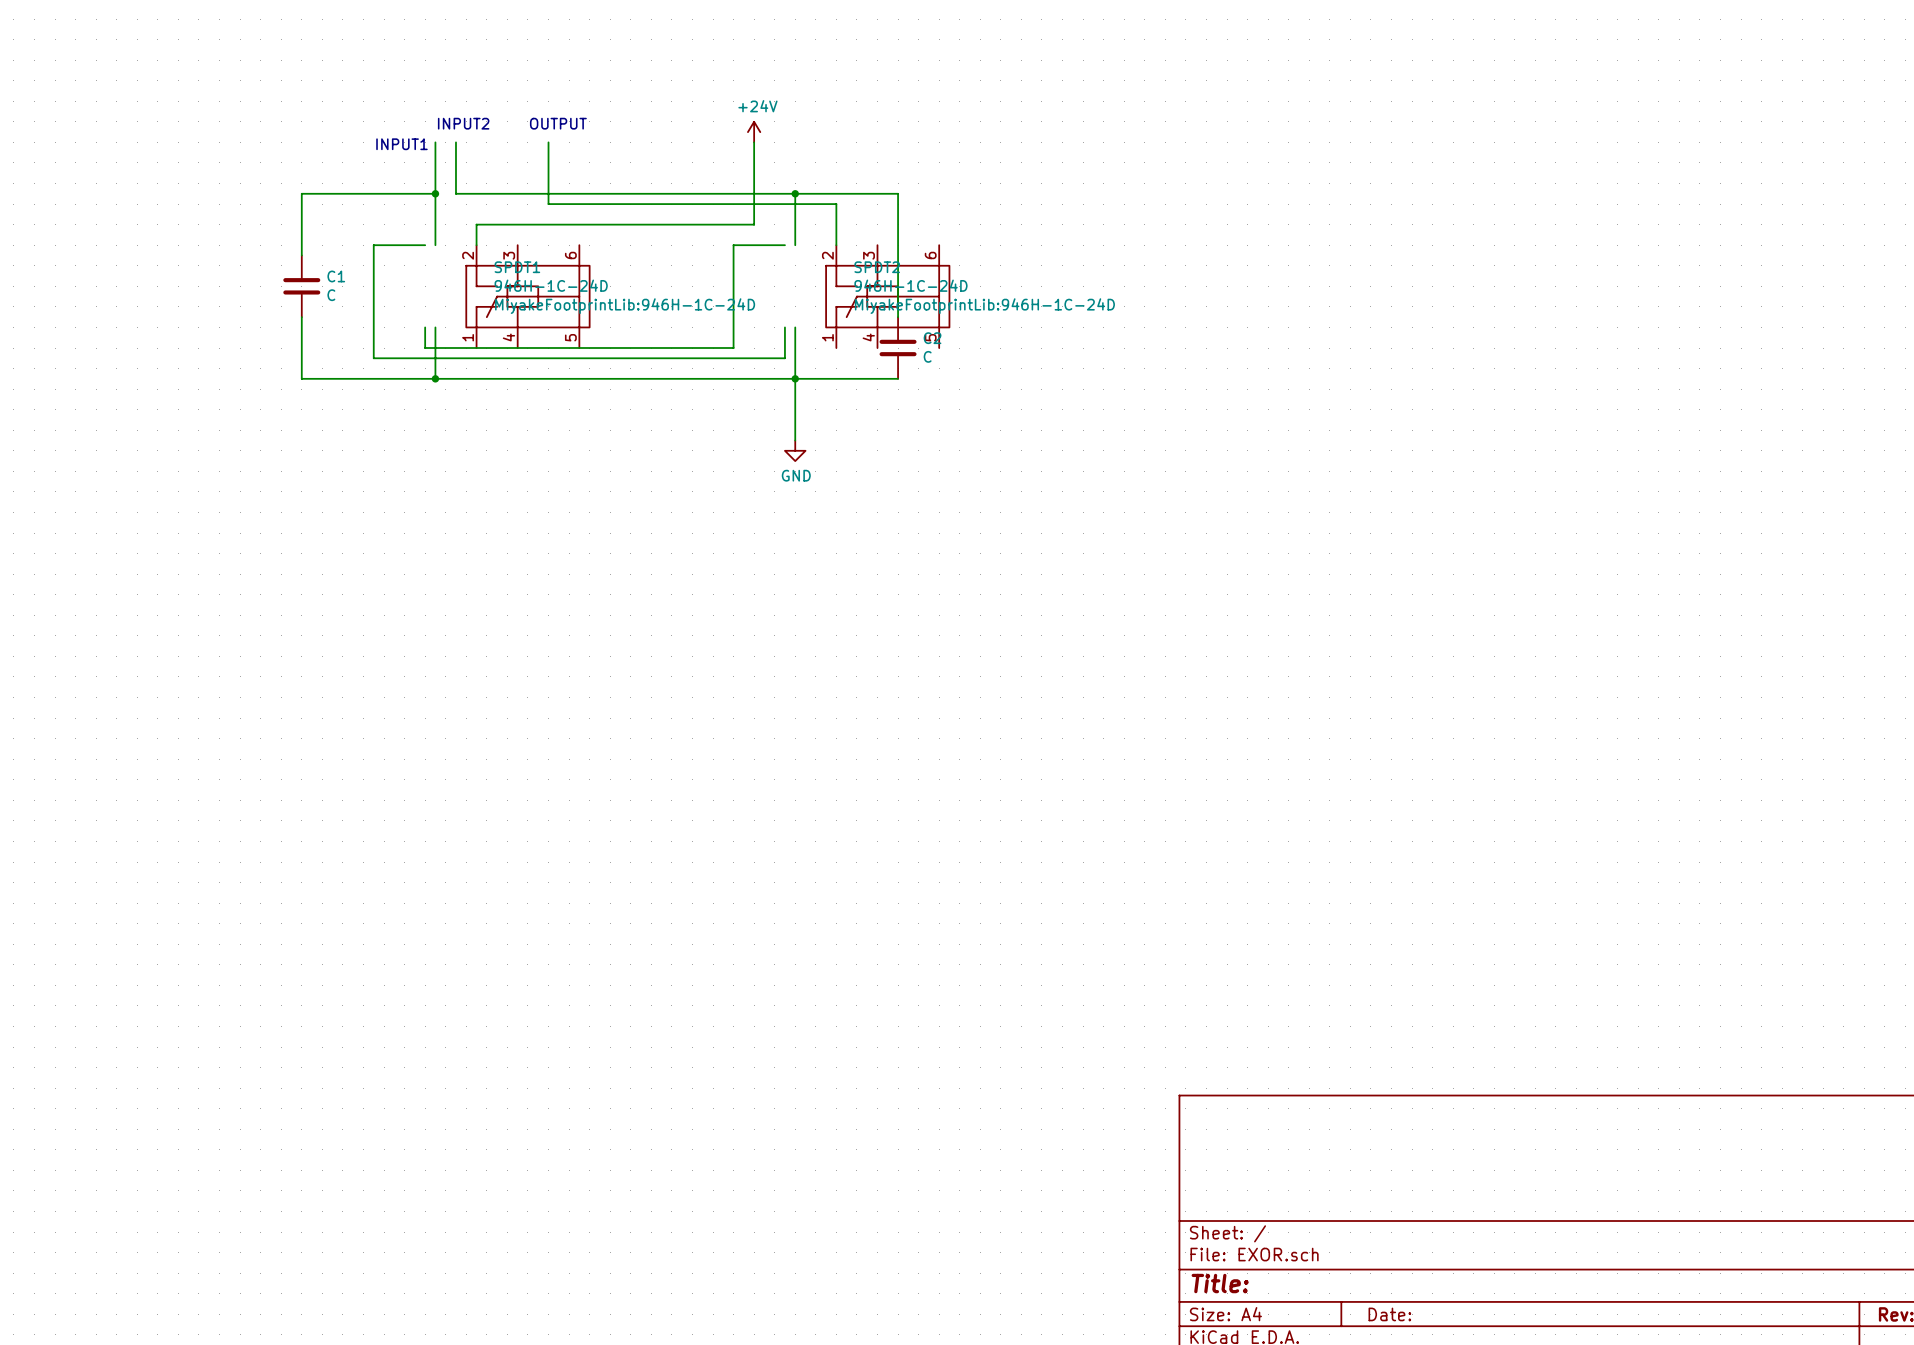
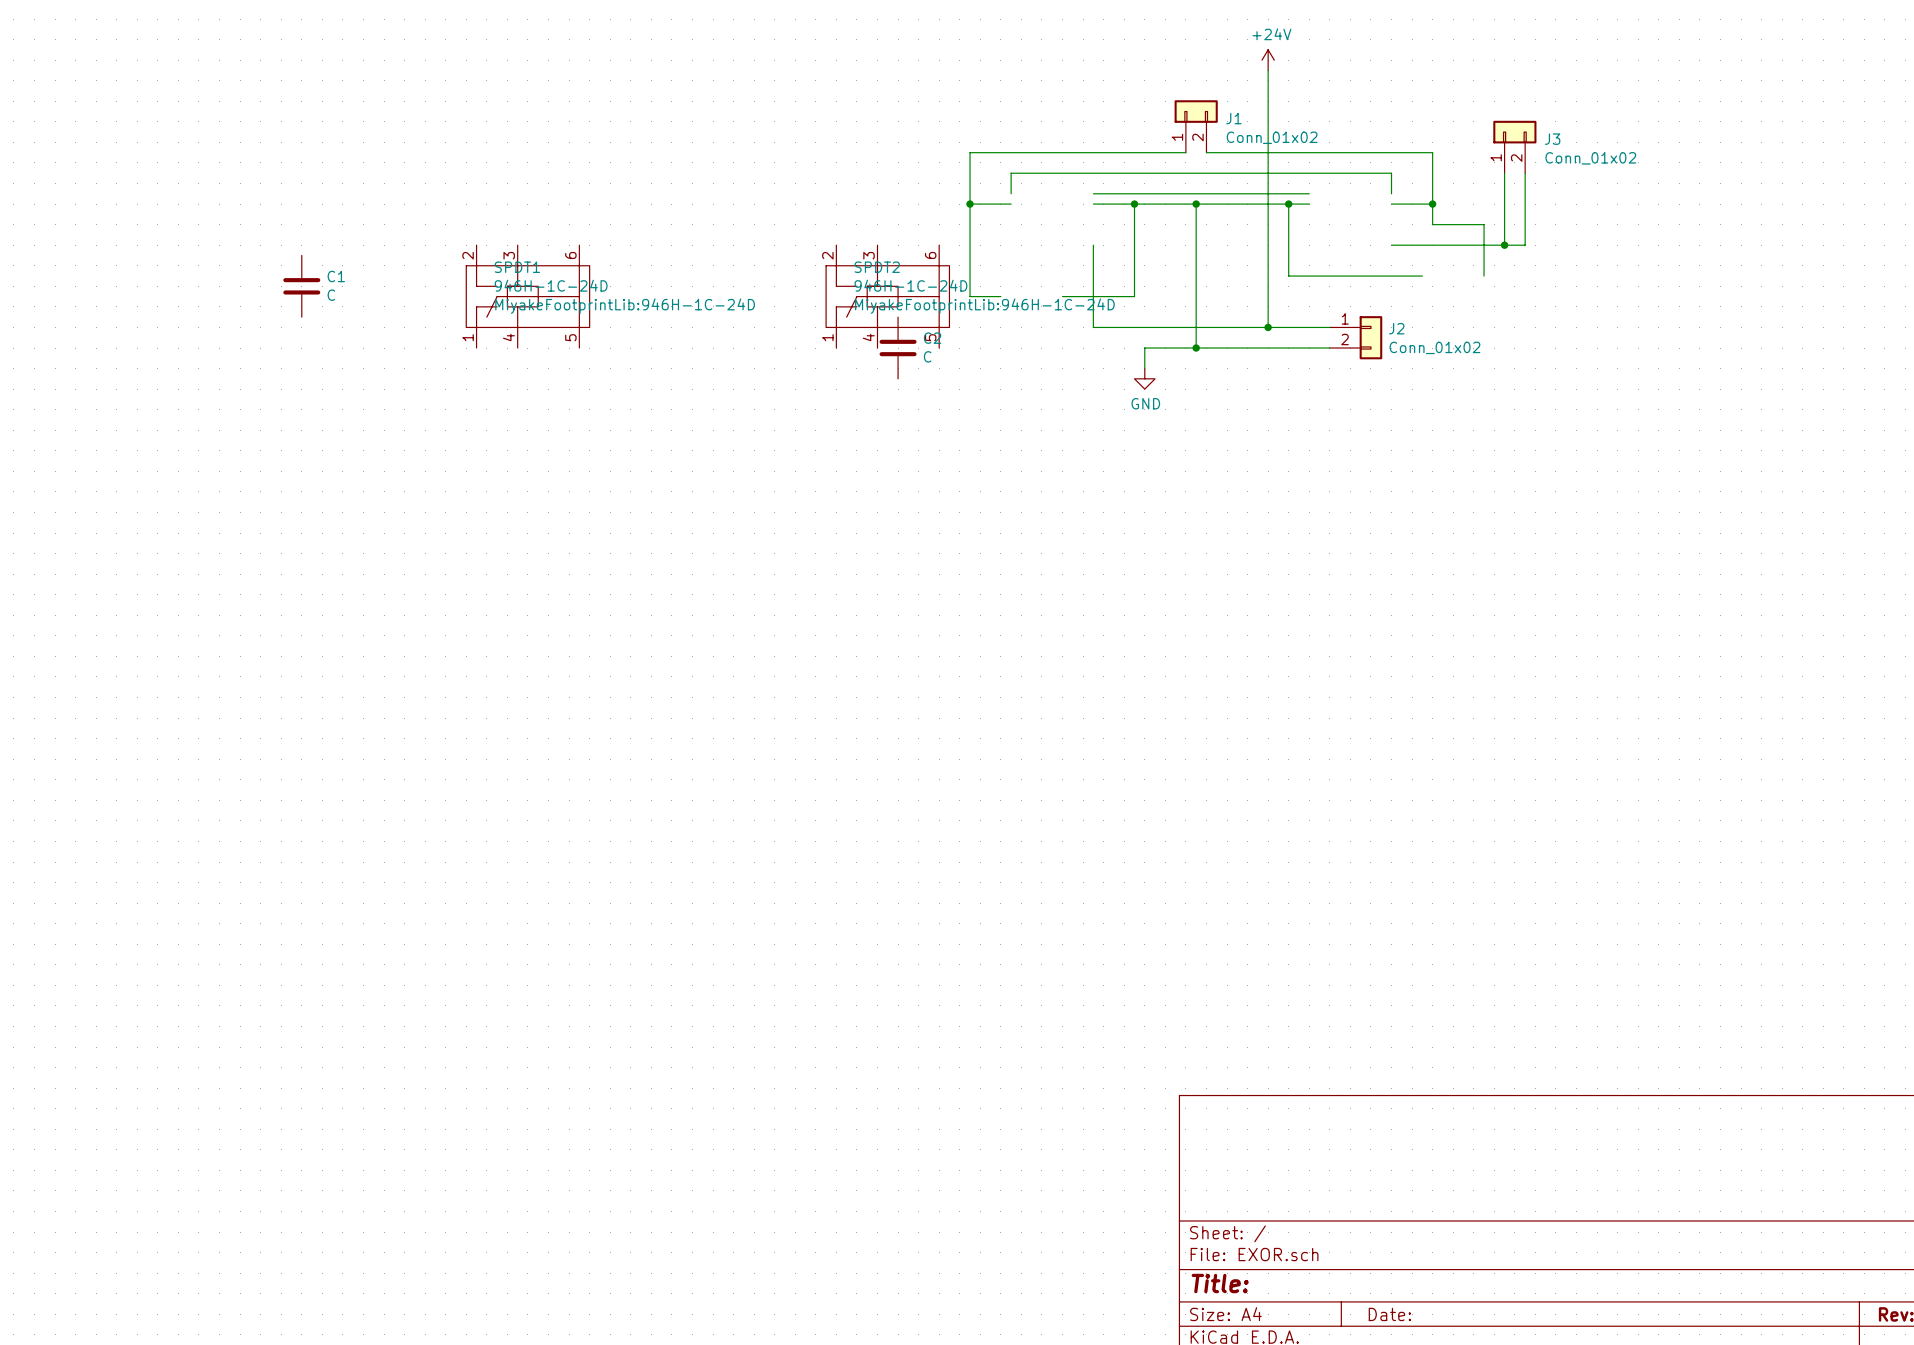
power symbol: none -> +24V (1268, 60)
wire: none -> (1268, 70) (1268, 327)
text: INPUT2 (463, 123) -> none
text: OUTPUT (558, 123) -> none
J1: none -> Conn_01x02 (1196, 126)
power symbol: +24V (754, 132) -> none
wire: (435, 142) (435, 245) -> none
wire: (455, 142) (455, 193) (898, 193) (898, 317) -> none
wire: (548, 142) (548, 204) (836, 204) (836, 245) -> none
wire: (754, 142) (754, 224) (476, 224) (476, 245) -> none
text: INPUT1 (401, 144) -> none
J3: none -> Conn_01x02 (1514, 147)
wire: none -> (1185, 152) (970, 152) (970, 296) (1000, 296)
wire: none -> (1206, 152) (1432, 152) (1432, 224) (1484, 224) (1484, 276)
wire: none -> (1504, 173) (1504, 245)
wire: none -> (1525, 173) (1525, 245) (1391, 245)
wire: (435, 193) (301, 193) (301, 255) -> none
junction: (435, 193) -> none
wire: (795, 193) (795, 245) -> none
junction: (795, 193) -> none
wire: none -> (1011, 193) (1011, 173) (1391, 173) (1391, 193)
wire: none -> (1093, 193) (1309, 193)
wire: none -> (970, 204) (1011, 204)
junction: none -> (970, 204)
wire: none -> (1093, 204) (1309, 204)
wire: none -> (1134, 204) (1134, 296) (1062, 296)
junction: none -> (1134, 204)
wire: none -> (1196, 204) (1196, 348)
junction: none -> (1196, 204)
wire: none -> (1288, 204) (1288, 276) (1422, 276)
junction: none -> (1288, 204)
wire: none -> (1391, 204) (1432, 204)
junction: none -> (1432, 204)
wire: (425, 245) (373, 245) (373, 358) (784, 358) (784, 327) -> none
wire: (784, 245) (733, 245) (733, 348) (425, 348) (425, 327) -> none
wire: none -> (1093, 245) (1093, 327) (1329, 327)
junction: none -> (1504, 245)
wire: (301, 317) (301, 378) (898, 378) -> none
wire: (435, 327) (435, 378) -> none
wire: (795, 327) (795, 440) -> none
junction: none -> (1268, 327)
J2: none -> Conn_01x02 (1356, 337)
junction: none -> (1196, 348)
wire: none -> (1329, 348) (1144, 348) (1144, 368)
junction: (435, 378) -> none
junction: (795, 378) -> none
power symbol: none -> GND (1144, 378)
power symbol: GND (795, 450) -> none

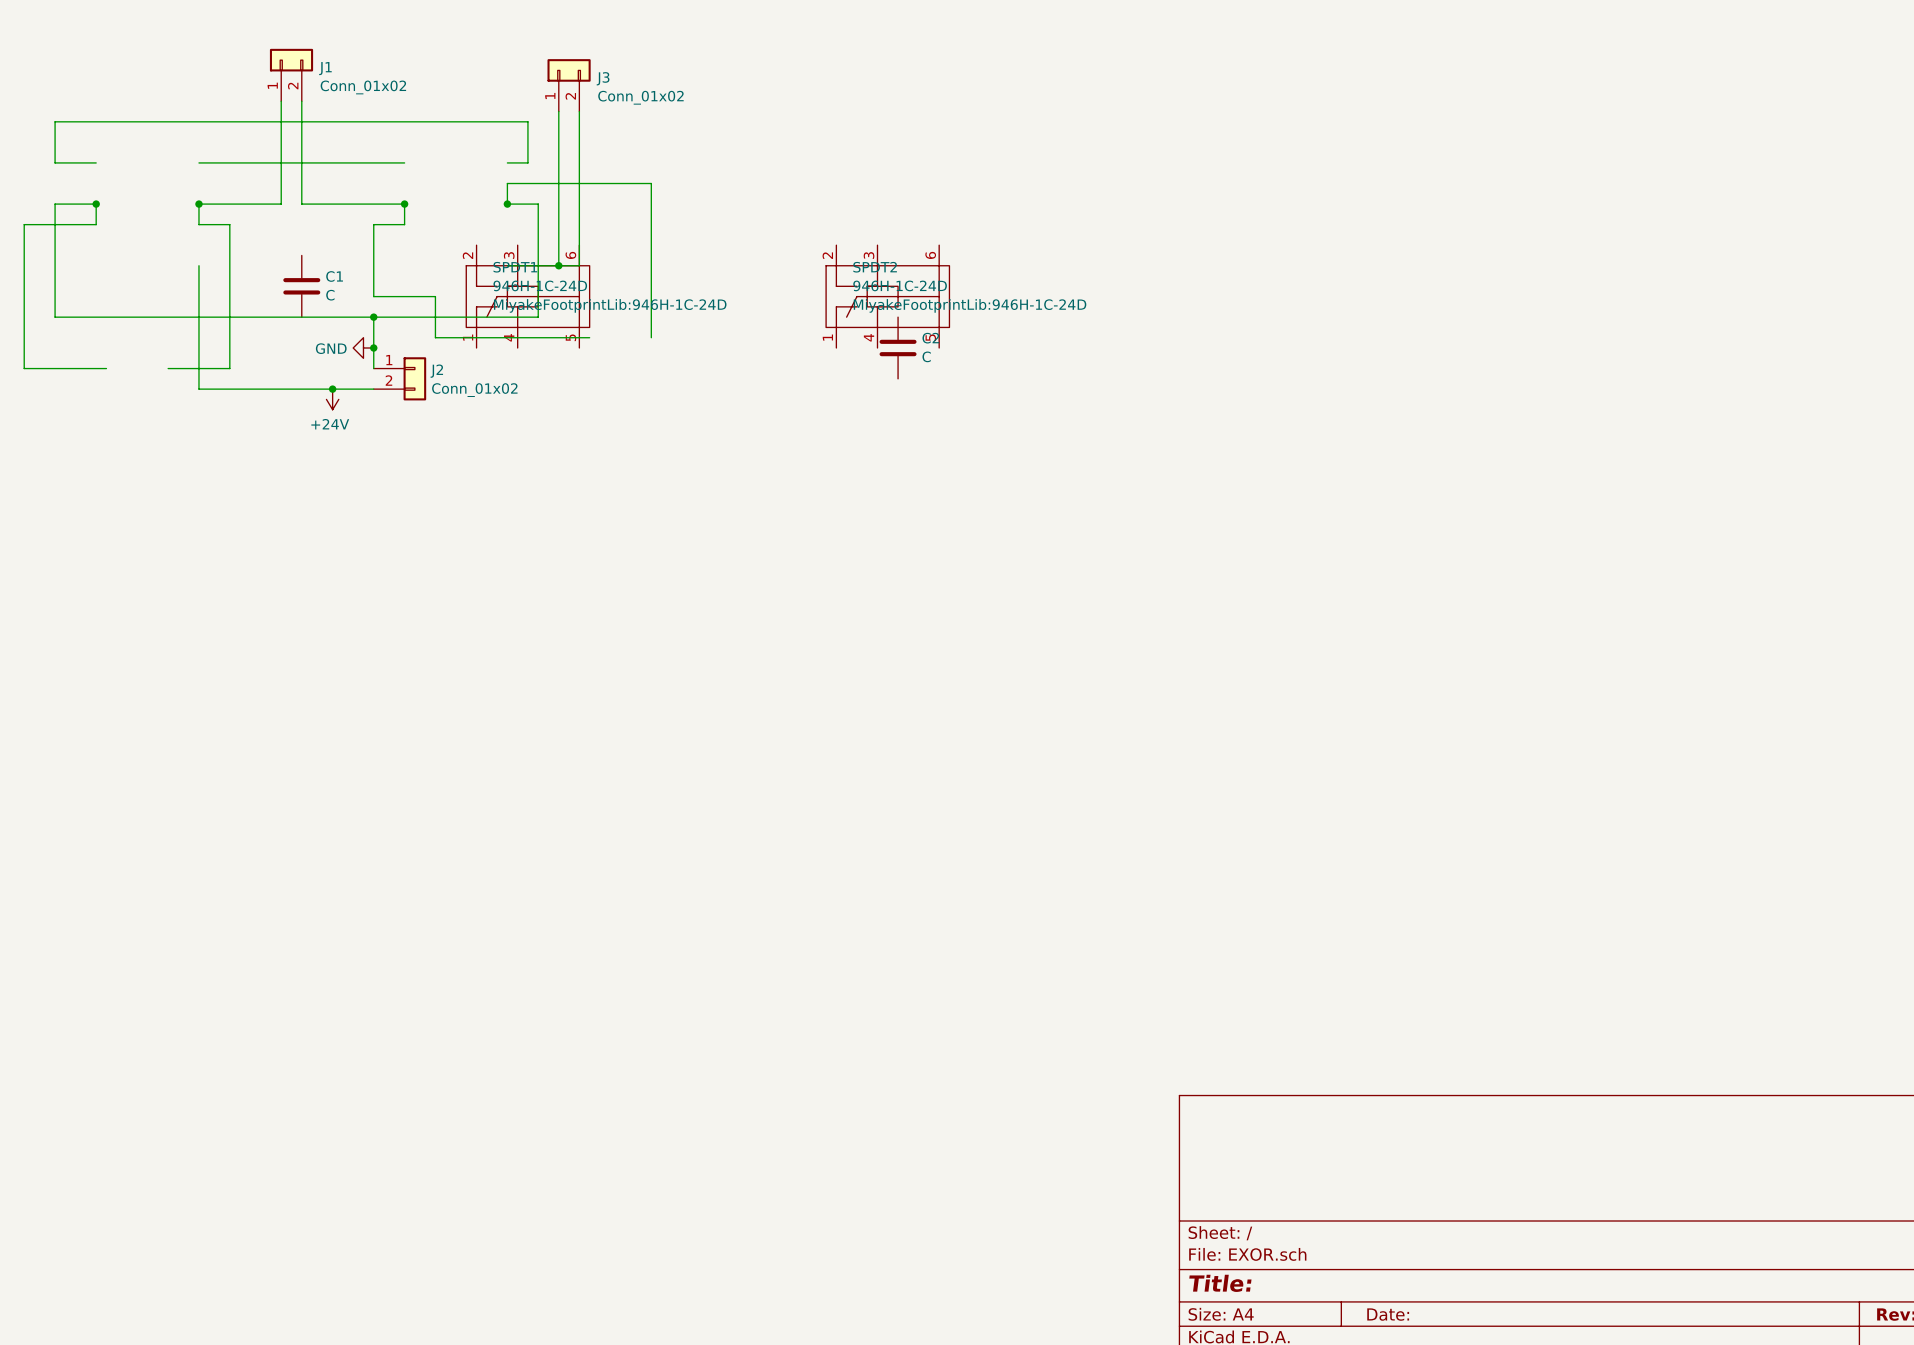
power symbol: +24V (1268, 60) -> none
wire: (1268, 70) (1268, 327) -> none
wire: none -> (281, 101) (281, 204) (198, 204) (198, 224) (229, 224) (229, 368) (168, 368)
wire: none -> (301, 101) (301, 204) (404, 204) (404, 224) (373, 224) (373, 296) (435, 296) (435, 337) (589, 337)
wire: none -> (558, 111) (558, 265)
wire: none -> (579, 111) (579, 265) (507, 265)
J1 position: (1196, 126) -> (291, 75)
J3 position: (1514, 147) -> (569, 85)
wire: (1185, 152) (970, 152) (970, 296) (1000, 296) -> none
wire: (1206, 152) (1432, 152) (1432, 224) (1484, 224) (1484, 276) -> none
wire: none -> (96, 162) (55, 162) (55, 121) (527, 121) (527, 162) (507, 162)
wire: none -> (198, 162) (404, 162)
wire: (1504, 173) (1504, 245) -> none
wire: (1525, 173) (1525, 245) (1391, 245) -> none
wire: (1011, 193) (1011, 173) (1391, 173) (1391, 193) -> none
wire: (1093, 193) (1309, 193) -> none
junction: none -> (96, 204)
junction: none -> (198, 204)
junction: none -> (404, 204)
junction: none -> (507, 204)
wire: (970, 204) (1011, 204) -> none
junction: (970, 204) -> none
wire: (1093, 204) (1309, 204) -> none
wire: (1134, 204) (1134, 296) (1062, 296) -> none
junction: (1134, 204) -> none
wire: (1196, 204) (1196, 348) -> none
junction: (1196, 204) -> none
wire: (1288, 204) (1288, 276) (1422, 276) -> none
junction: (1288, 204) -> none
wire: (1391, 204) (1432, 204) -> none
junction: (1432, 204) -> none
wire: (1093, 245) (1093, 327) (1329, 327) -> none
junction: (1504, 245) -> none
wire: none -> (198, 265) (198, 389) (373, 389)
junction: none -> (558, 265)
wire: none -> (373, 317) (373, 368)
junction: none -> (373, 317)
junction: (1268, 327) -> none
wire: none -> (651, 337) (651, 183) (507, 183) (507, 204) (538, 204) (538, 317) (55, 317) (55, 204) (96, 204) (96, 224) (24, 224) (24, 368) (106, 368)
J2 position: (1356, 337) -> (399, 378)
power symbol: none -> GND (363, 348)
junction: none -> (373, 348)
junction: (1196, 348) -> none
wire: (1329, 348) (1144, 348) (1144, 368) -> none
power symbol: GND (1144, 378) -> none
junction: none -> (332, 389)
power symbol: none -> +24V (332, 399)

